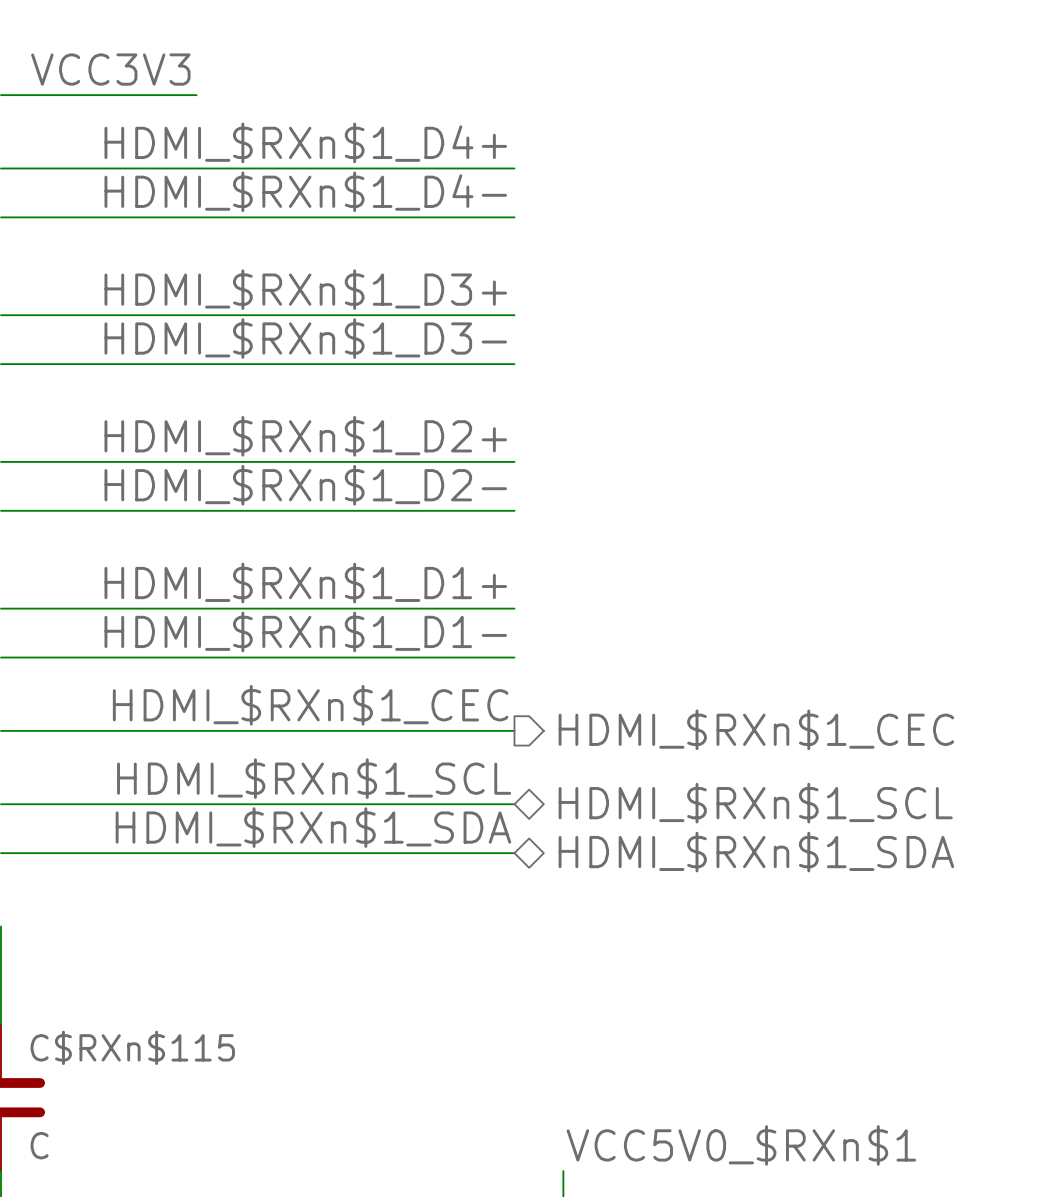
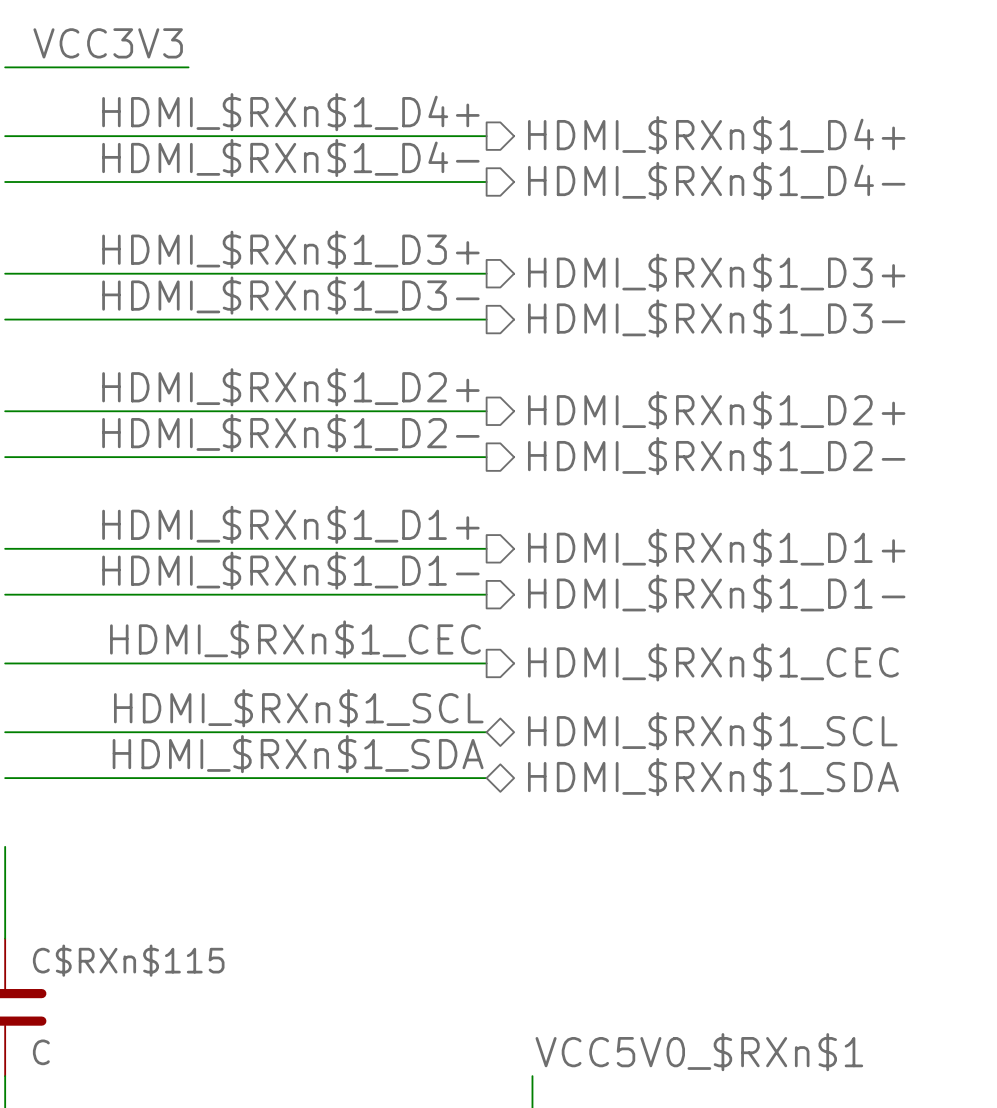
hierarchical label: none -> HDMI_$RXn$1_D4+ (716, 135)
hierarchical label: none -> HDMI_$RXn$1_D4- (716, 180)
hierarchical label: none -> HDMI_$RXn$1_D3+ (716, 272)
hierarchical label: none -> HDMI_$RXn$1_D3- (716, 318)
hierarchical label: none -> HDMI_$RXn$1_D2+ (716, 410)
hierarchical label: none -> HDMI_$RXn$1_D2- (716, 456)
hierarchical label: none -> HDMI_$RXn$1_D1+ (716, 547)
hierarchical label: none -> HDMI_$RXn$1_D1- (716, 593)

